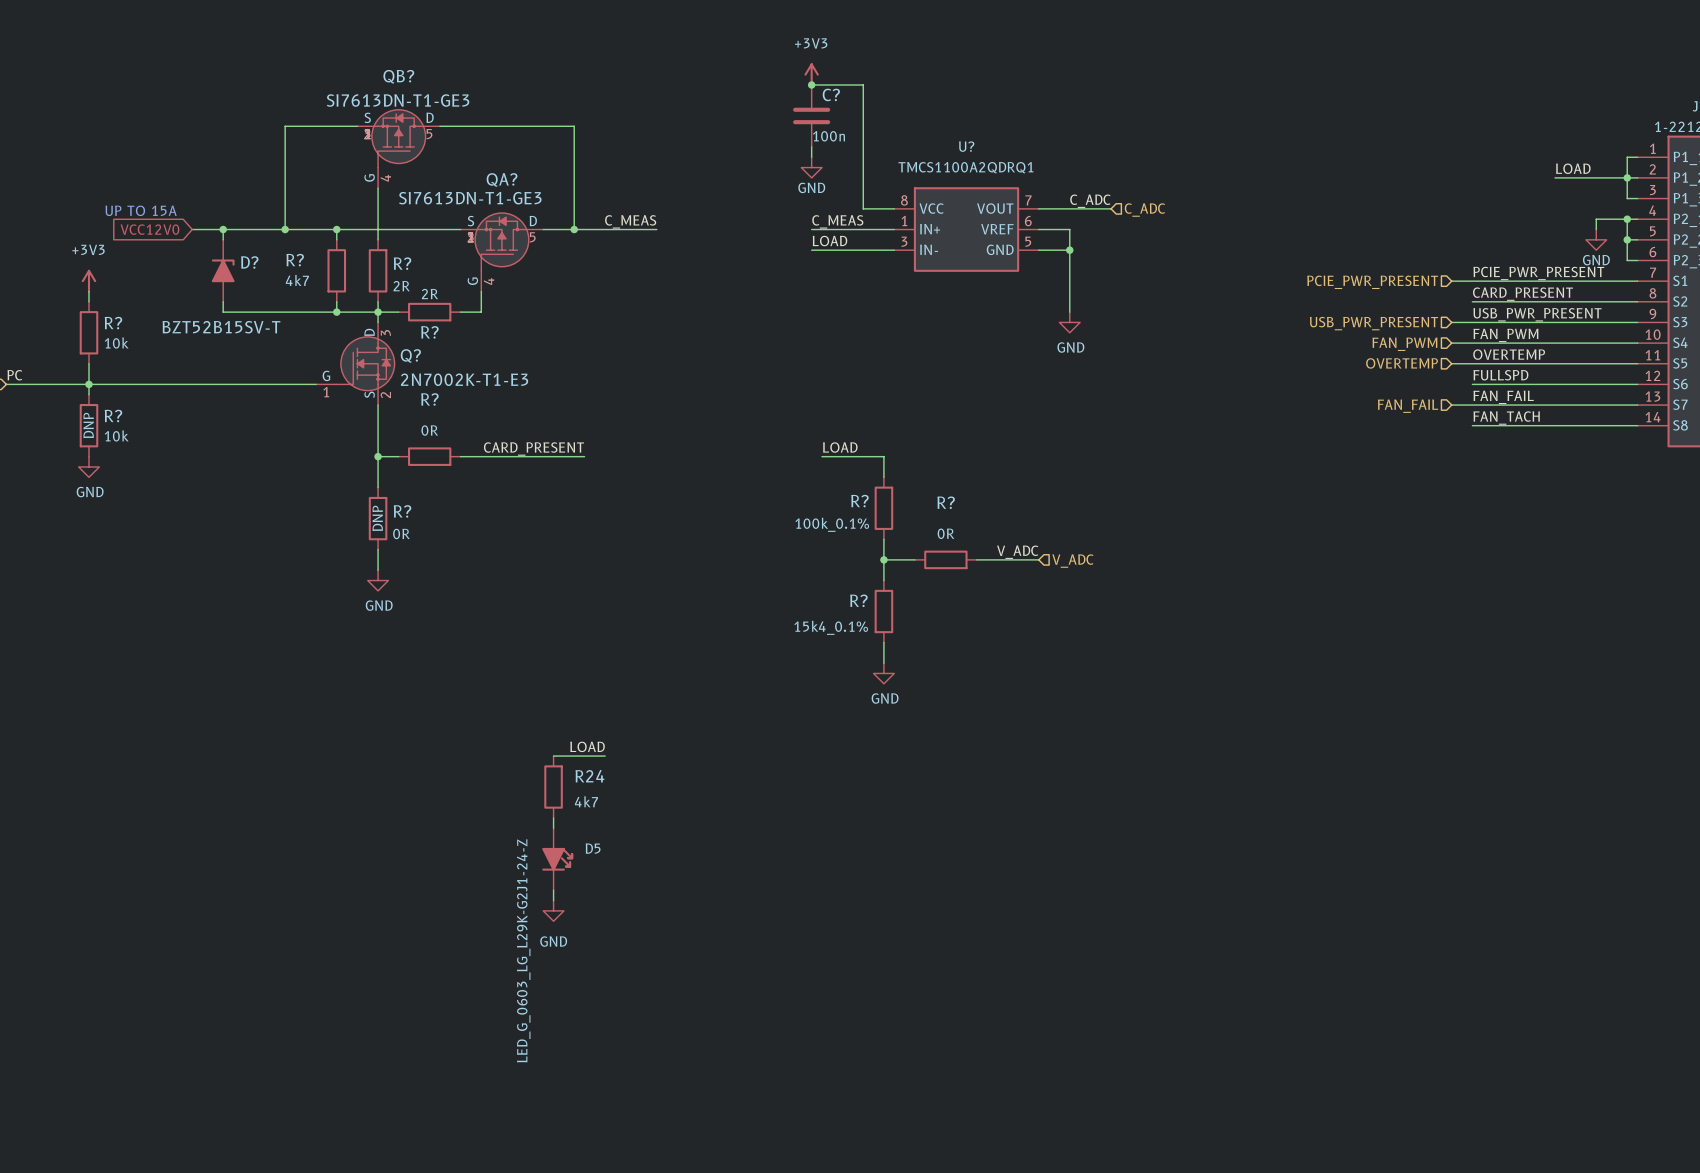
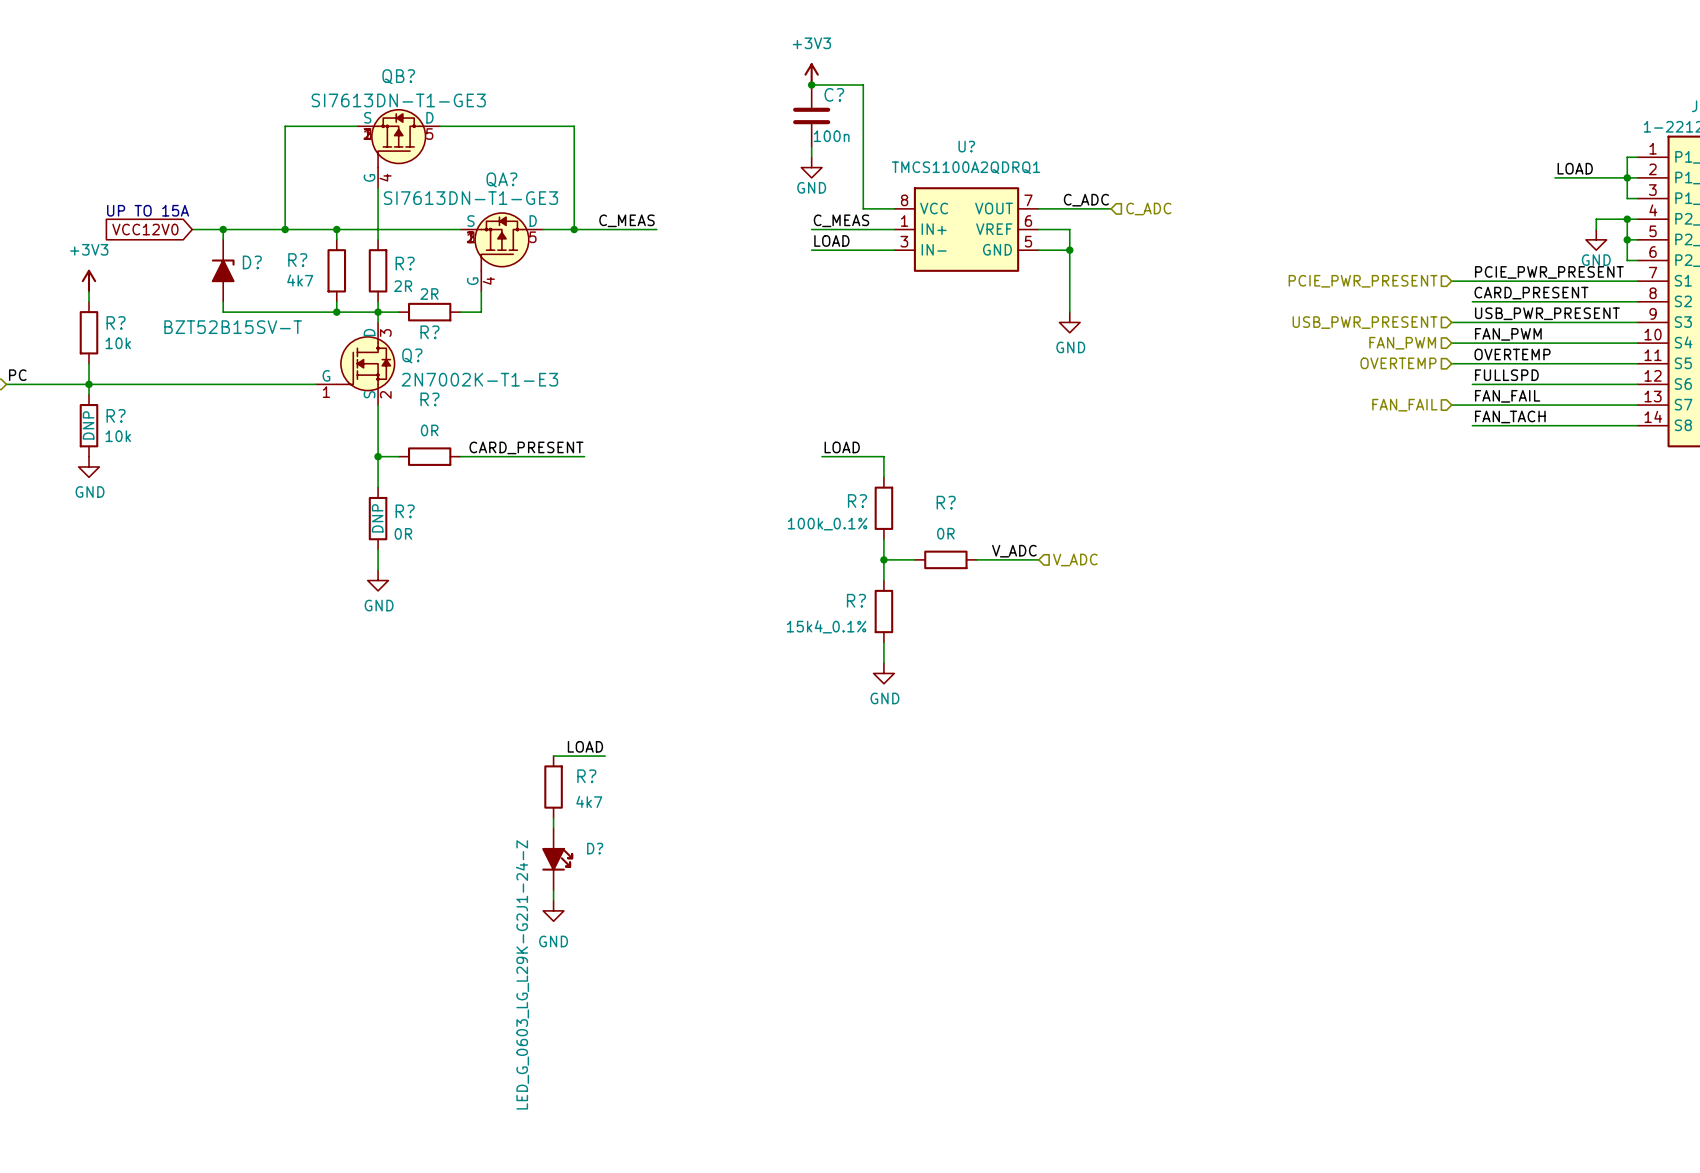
R24 name: R24 (589, 776) -> R? (586, 776)
D5 name: D5 (593, 848) -> D? (595, 848)

